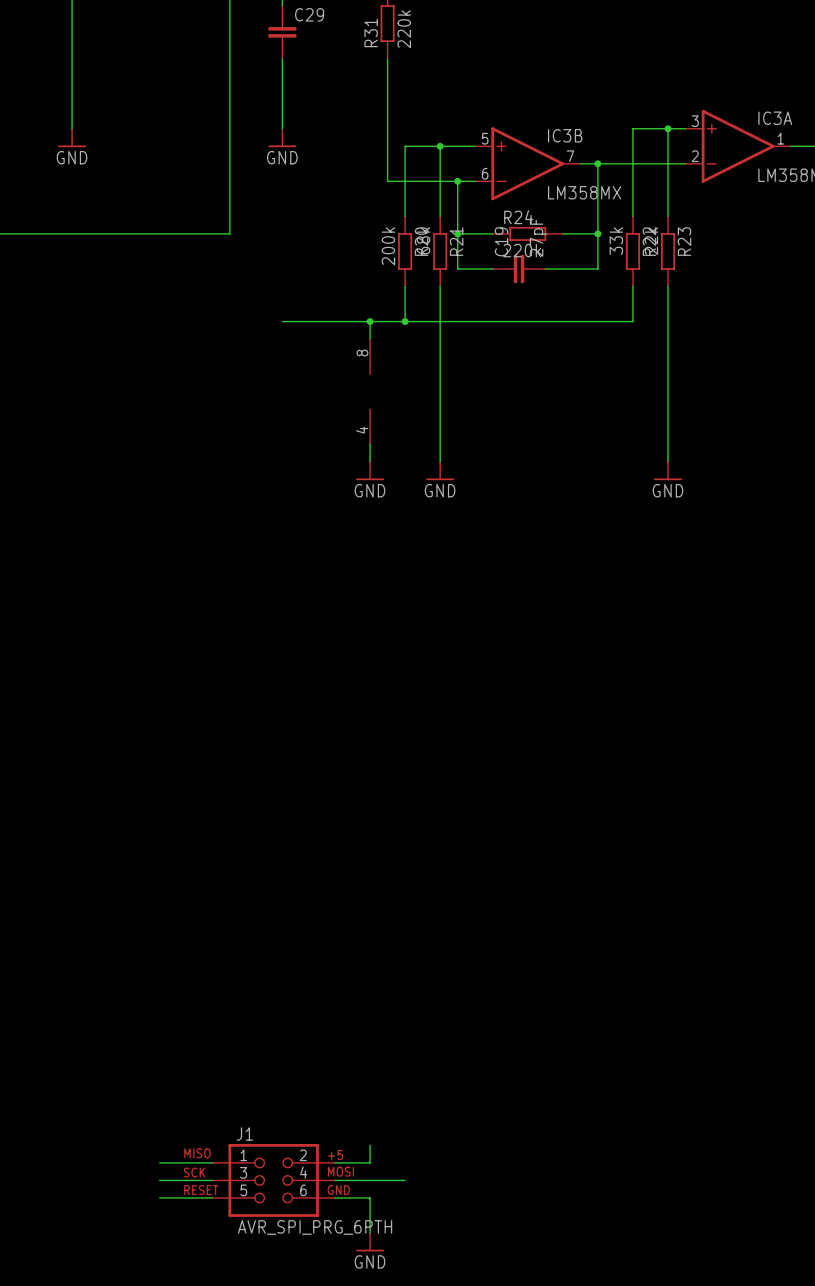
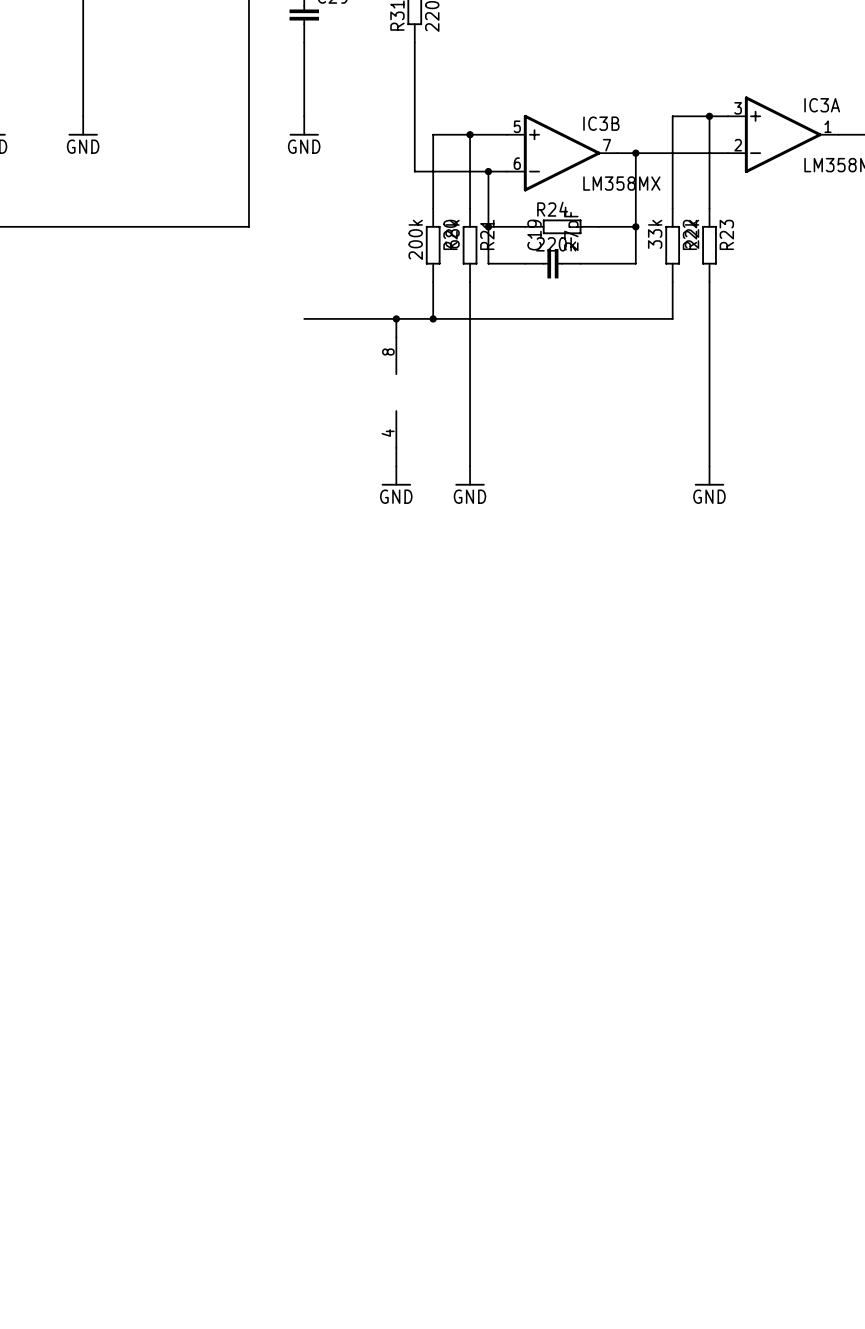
wire: (370, 1145) (370, 1162) (334, 1162) -> none
wire: (159, 1162) (212, 1162) -> none
wire: (159, 1180) (212, 1180) -> none
J1: AVR_SPI_PRG_6PTH (273, 1180) -> none
wire: (334, 1180) (405, 1180) -> none
wire: (159, 1197) (212, 1197) -> none
wire: (334, 1197) (370, 1197) (370, 1233) -> none
power symbol: GND (370, 1242) -> none

